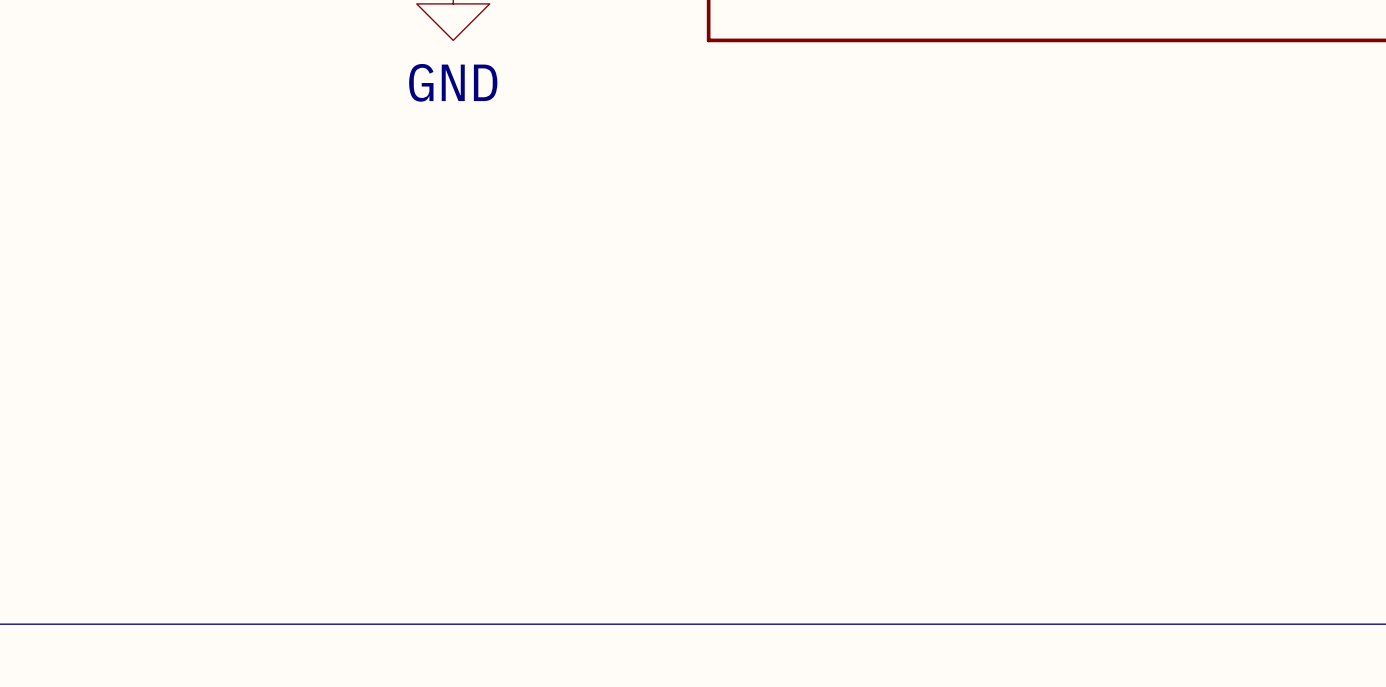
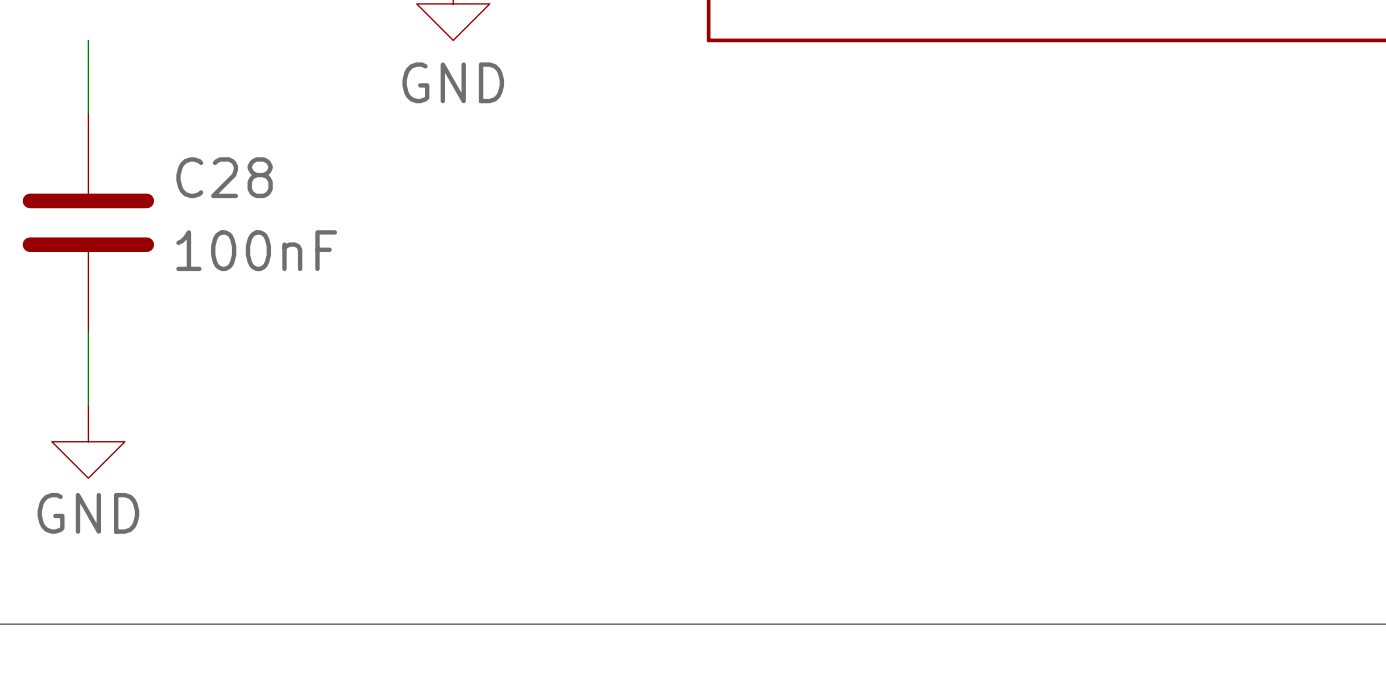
wire: none -> (88, 40) (88, 113)
C28: none -> 100nF (88, 222)
wire: none -> (88, 332) (88, 405)
power symbol: none -> GND (88, 441)

